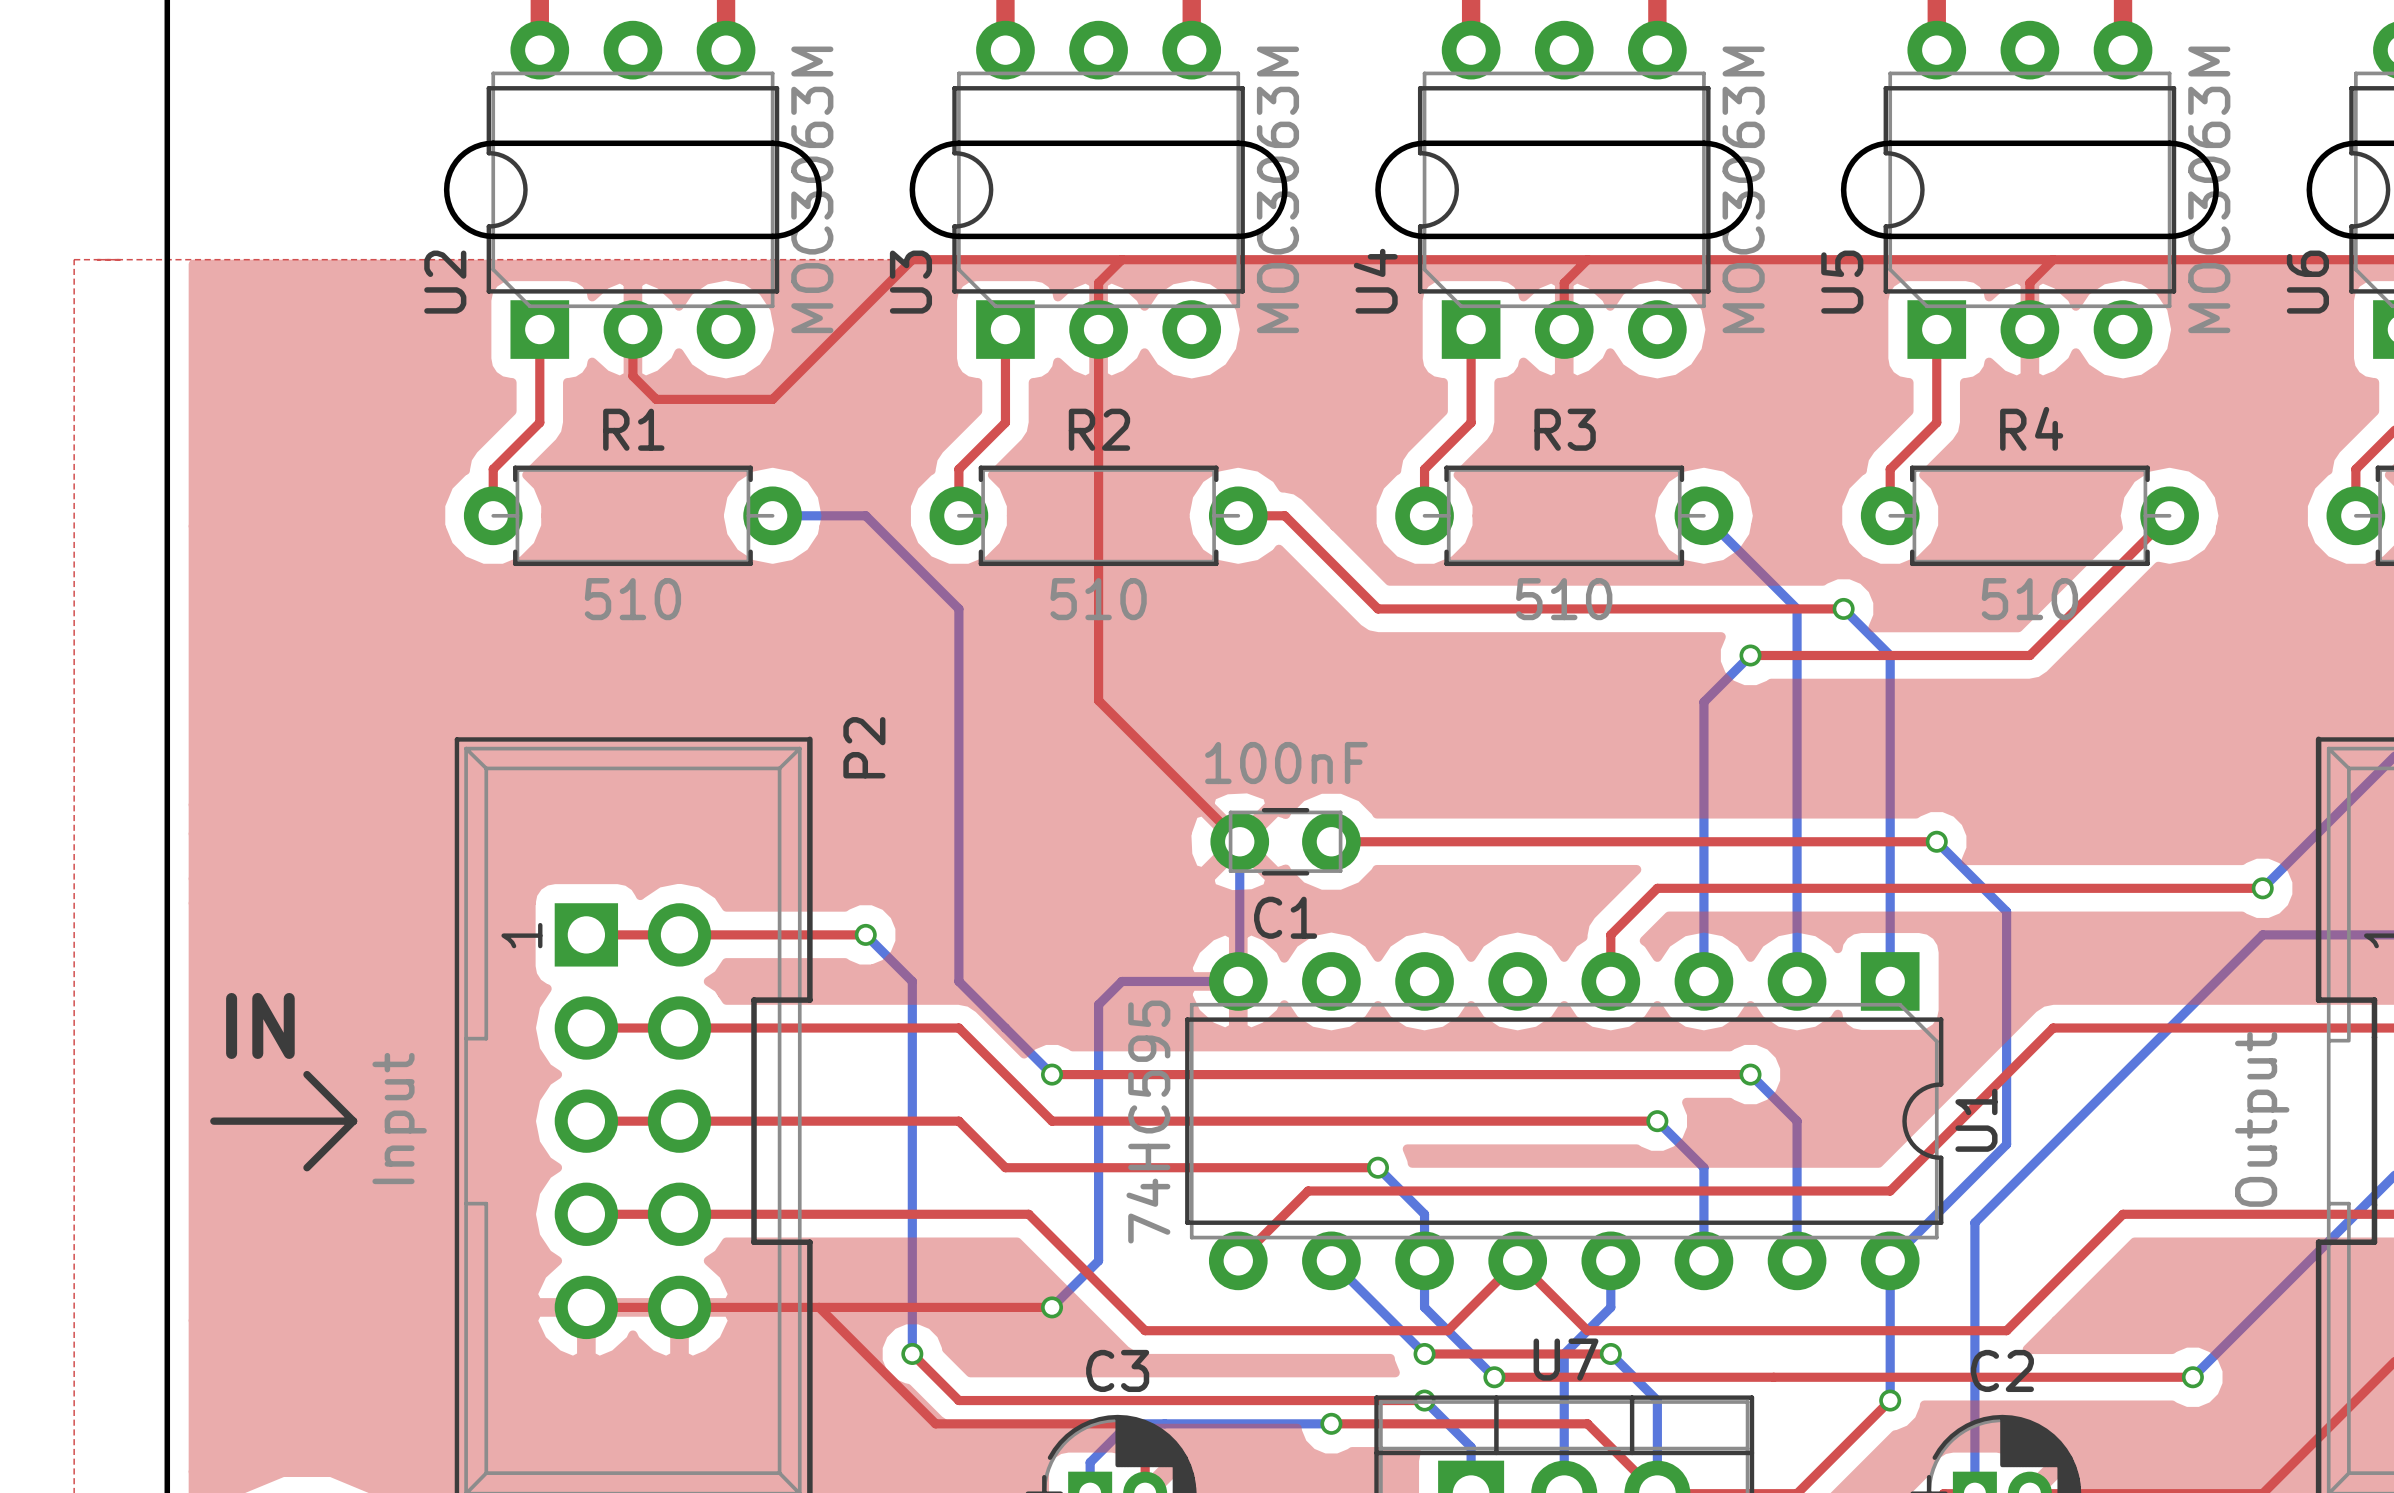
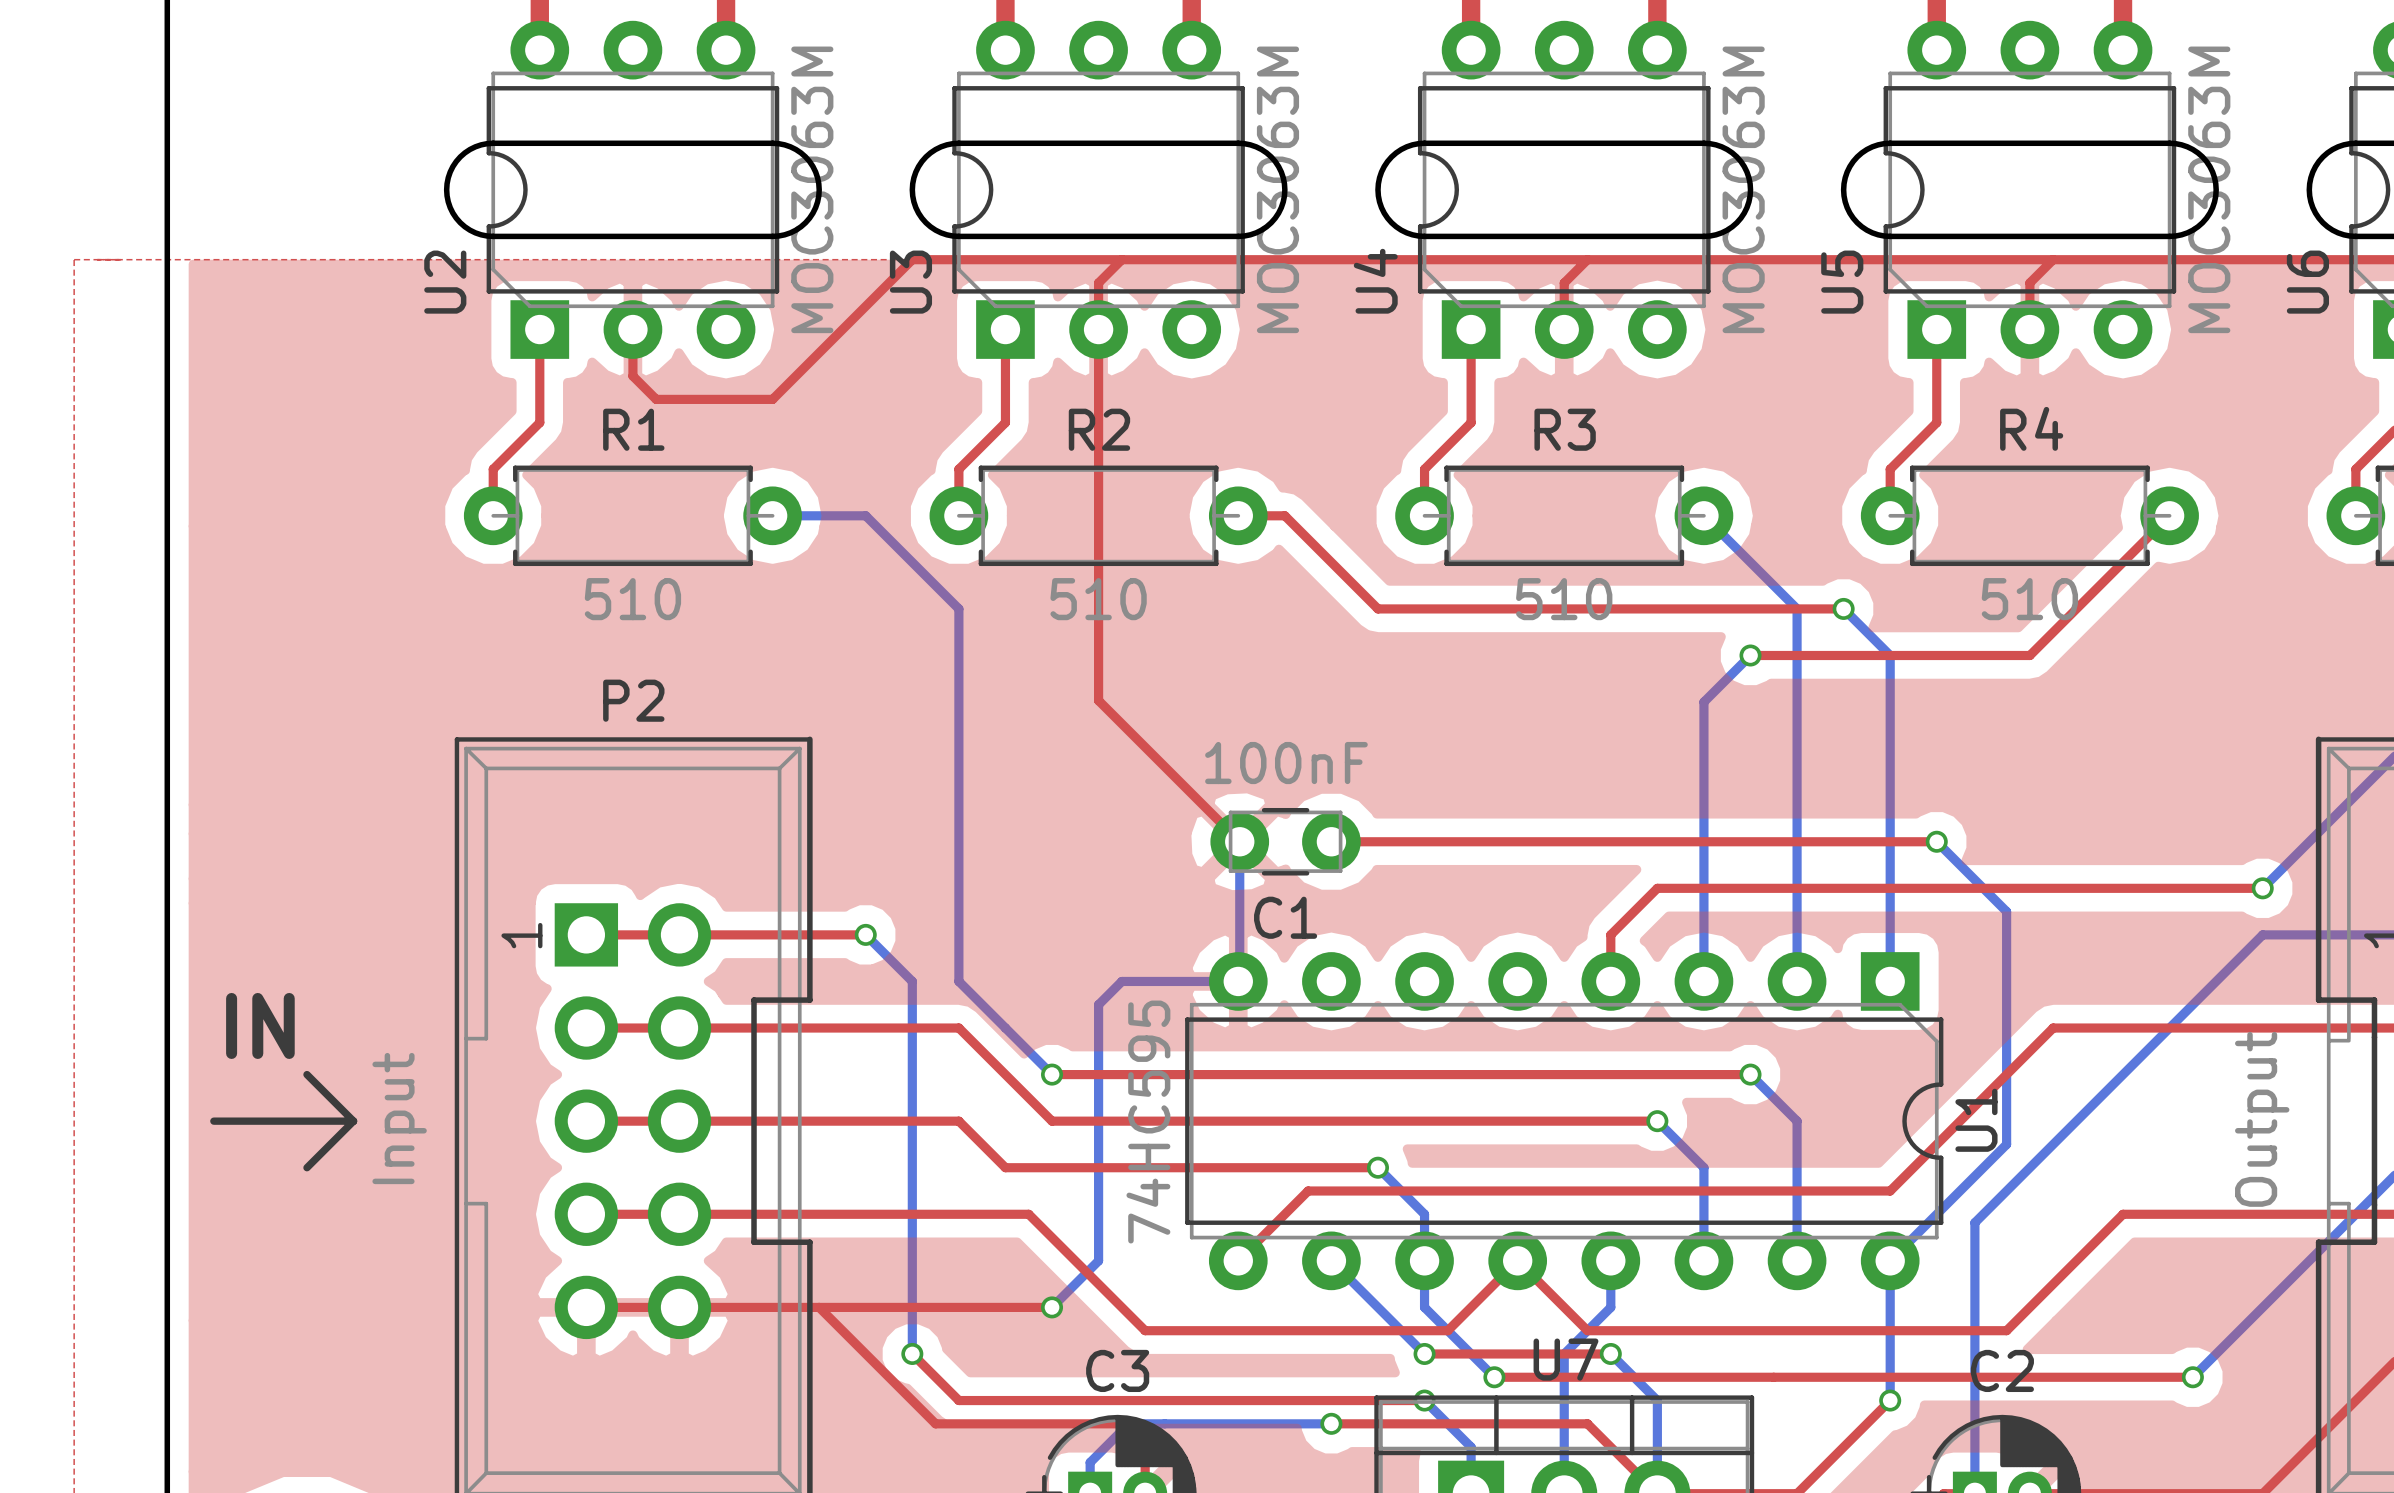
P2 name rotation: 0° (864, 747) -> 90° clockwise (633, 700)
P2 name position: P2 (864, 747) -> P2 (633, 700)

